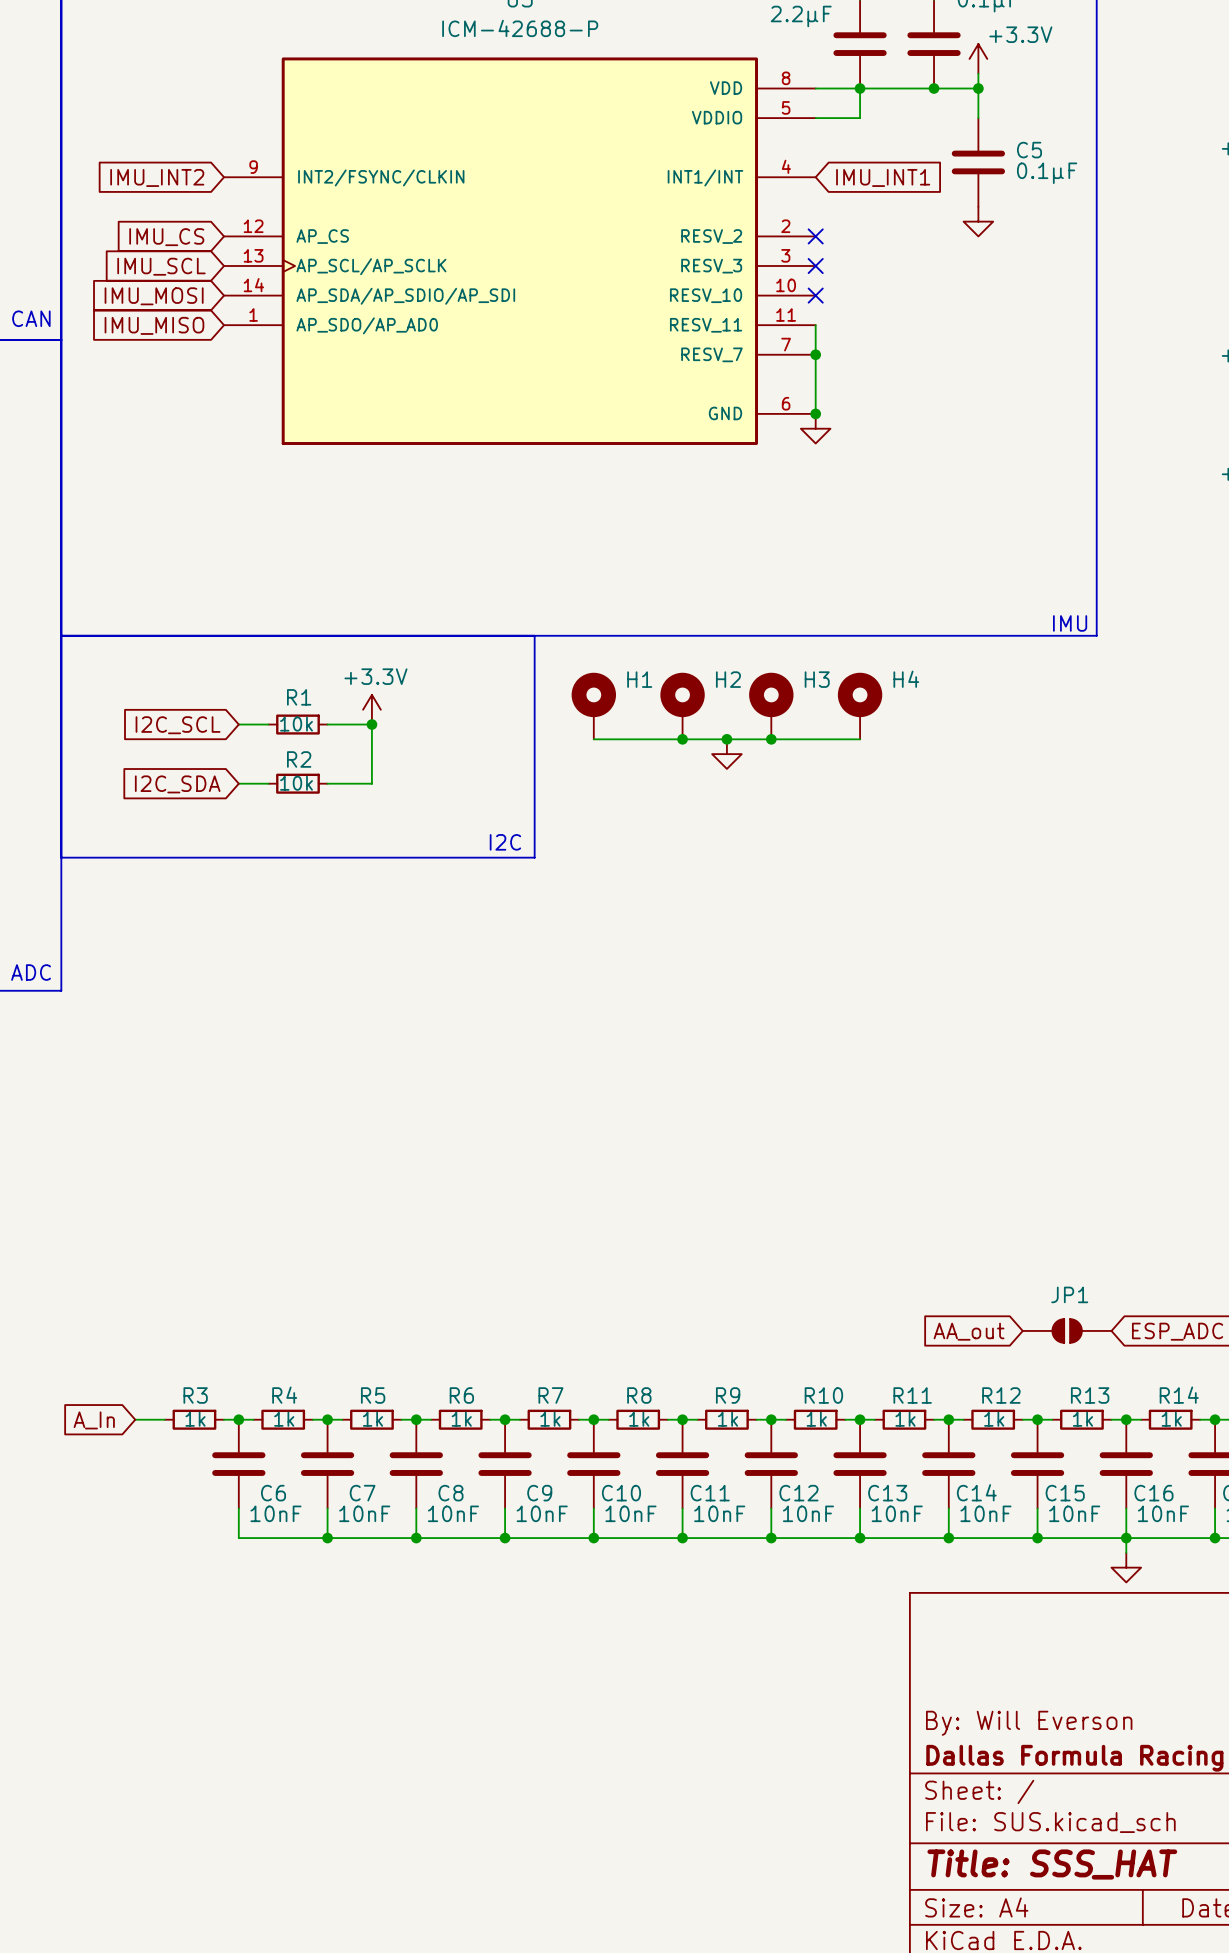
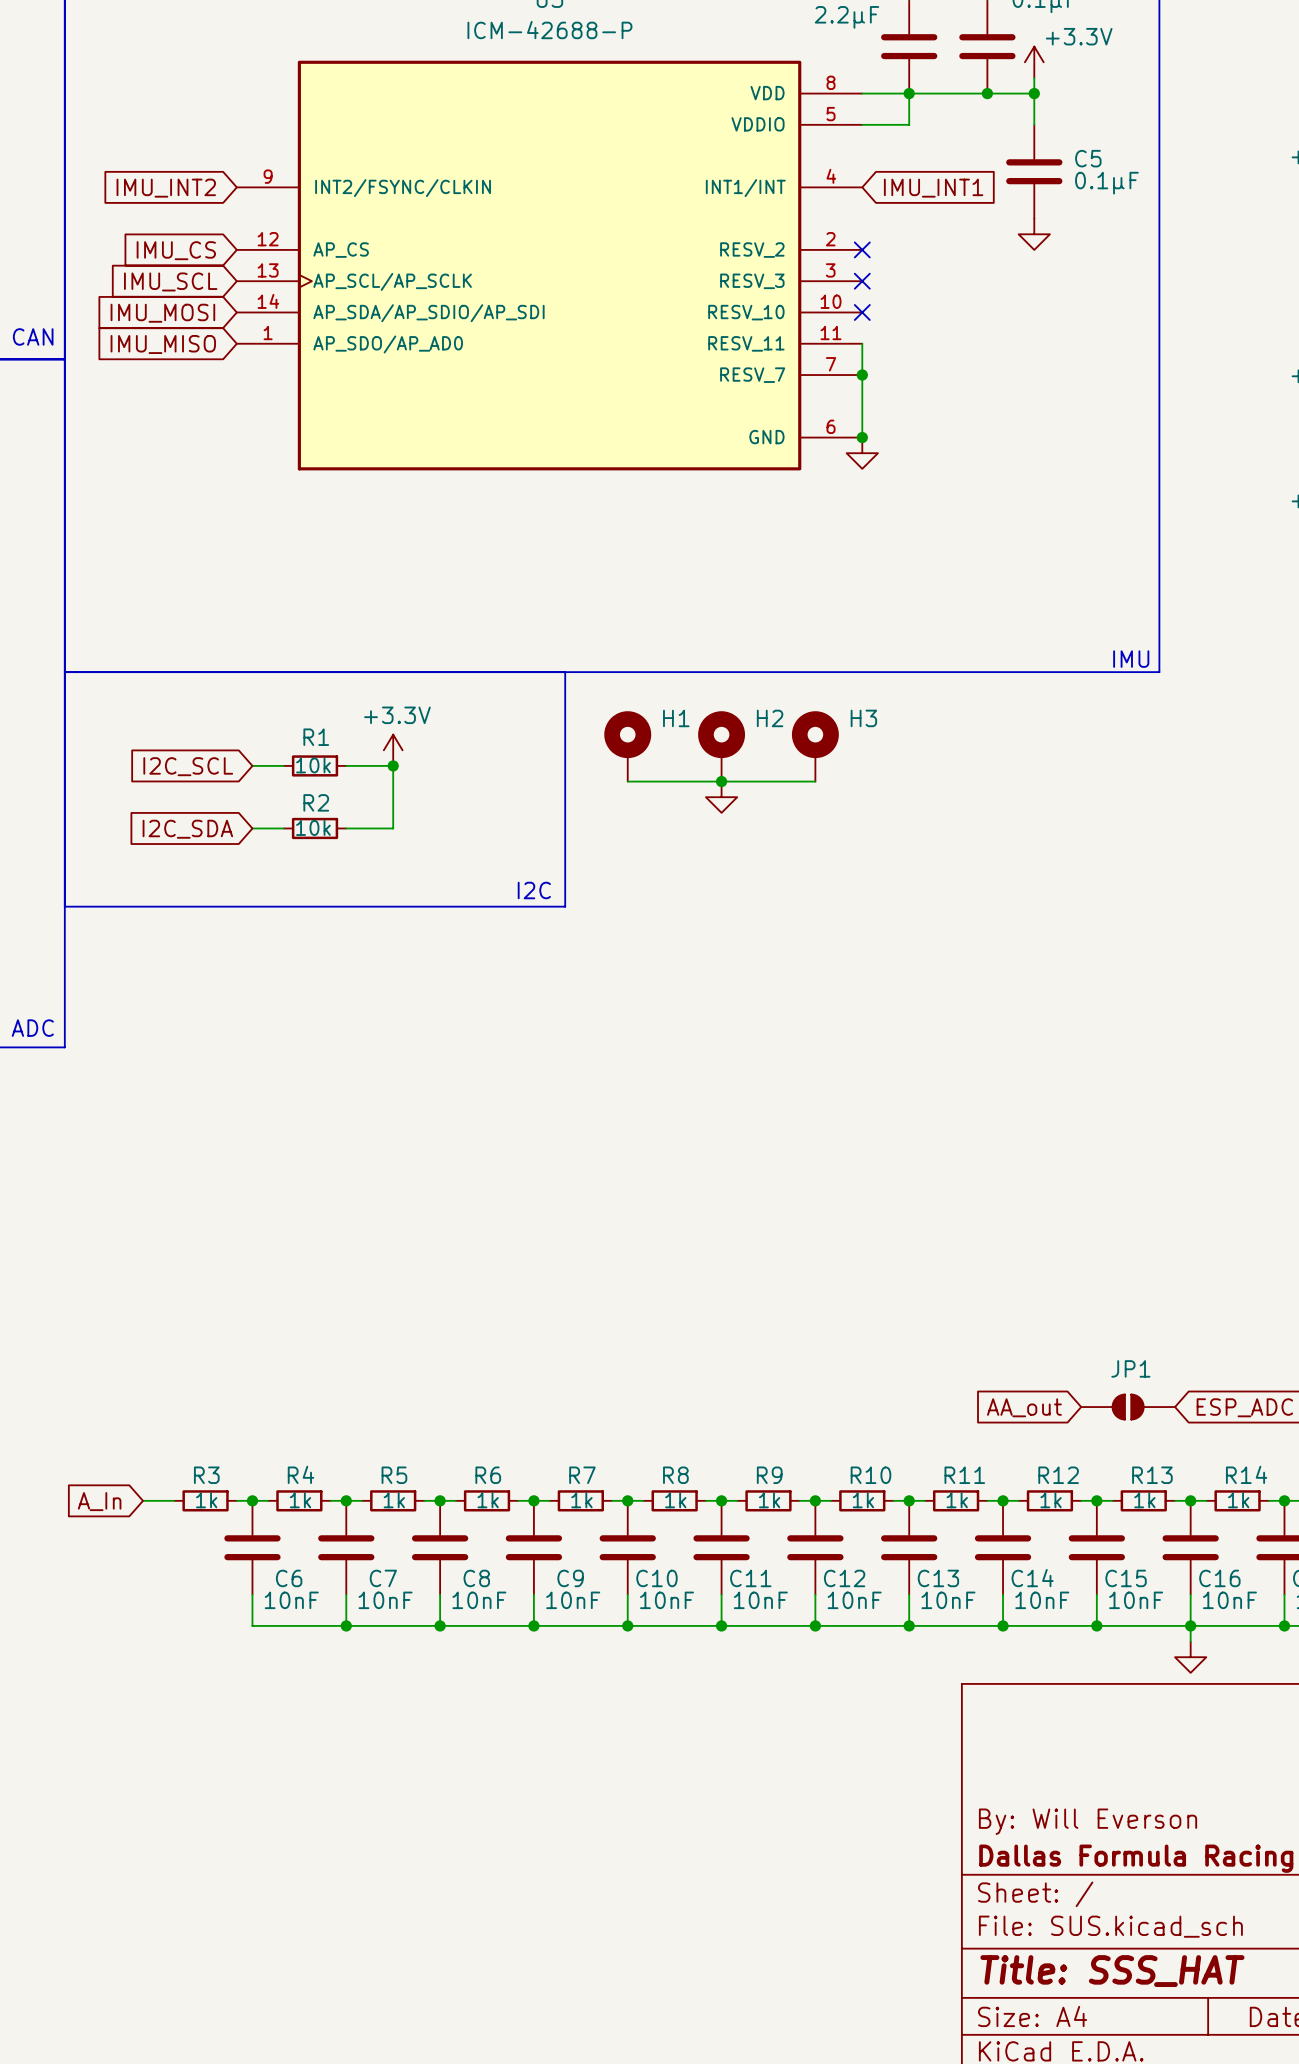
H4: (860, 706) -> none
junction: (726, 739) -> none
wire: (771, 739) (860, 739) -> none
junction: (771, 739) -> none
power symbol position: (726, 754) -> (721, 797)

